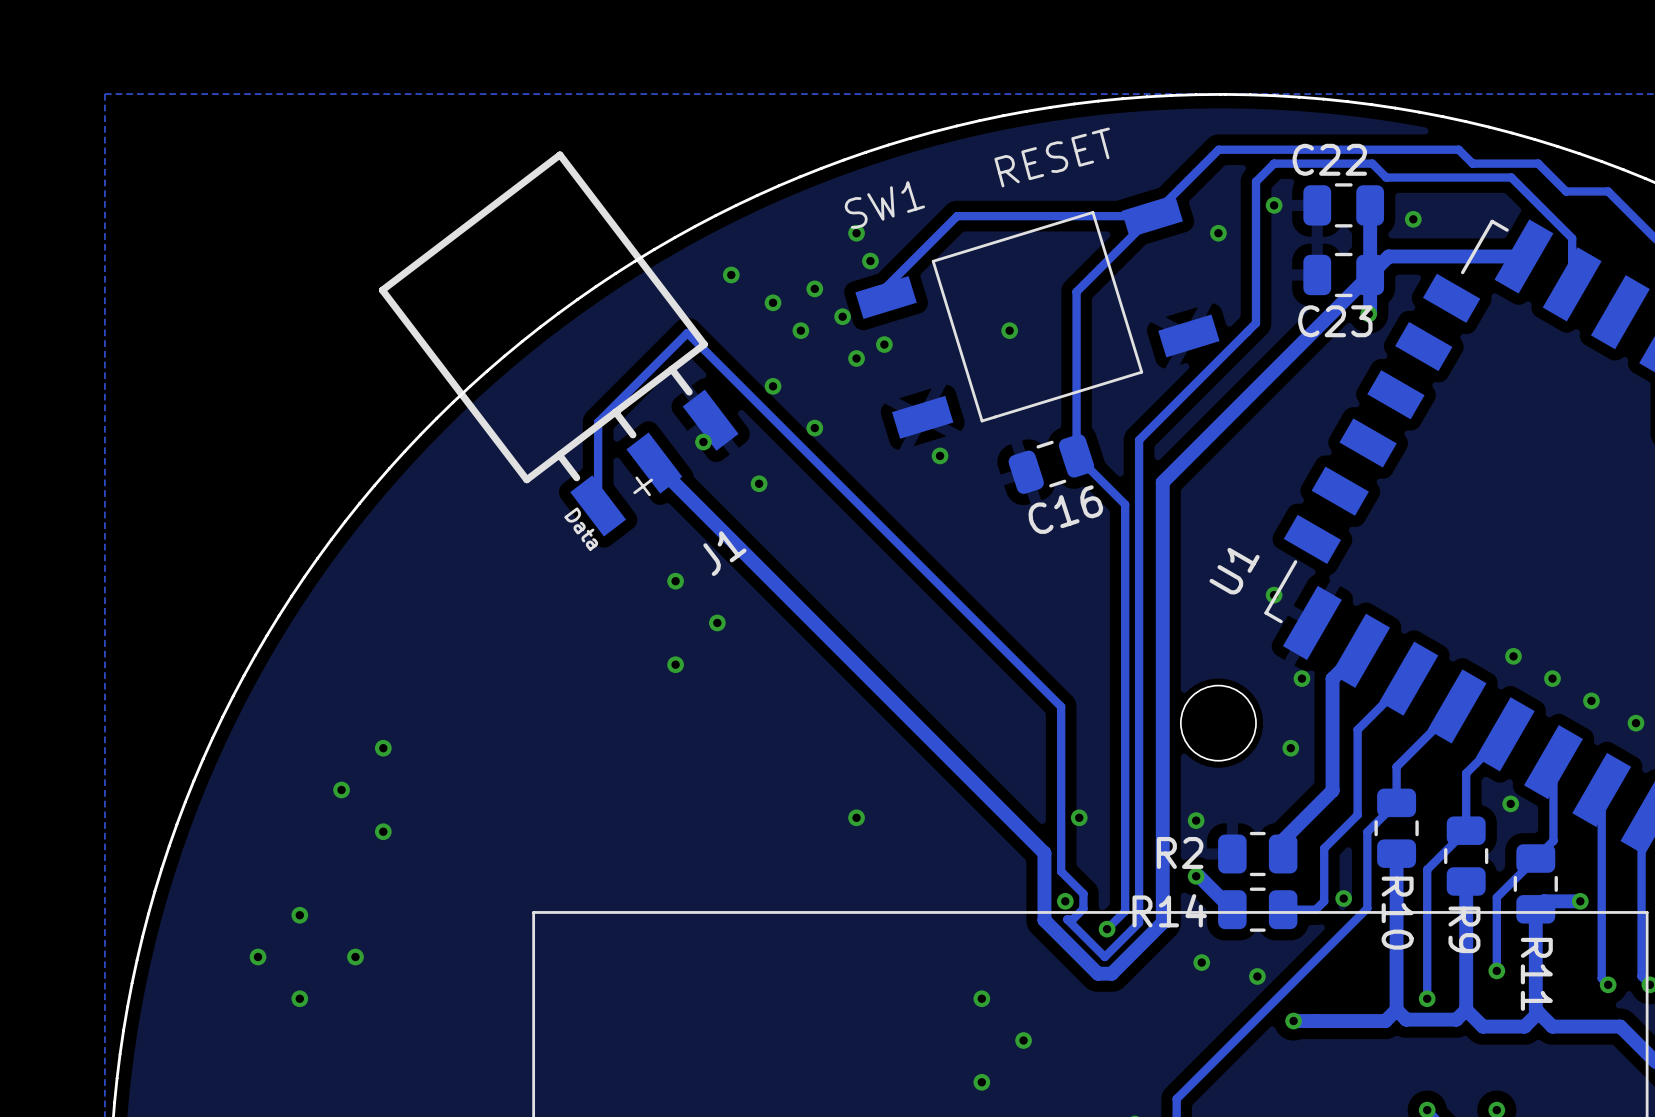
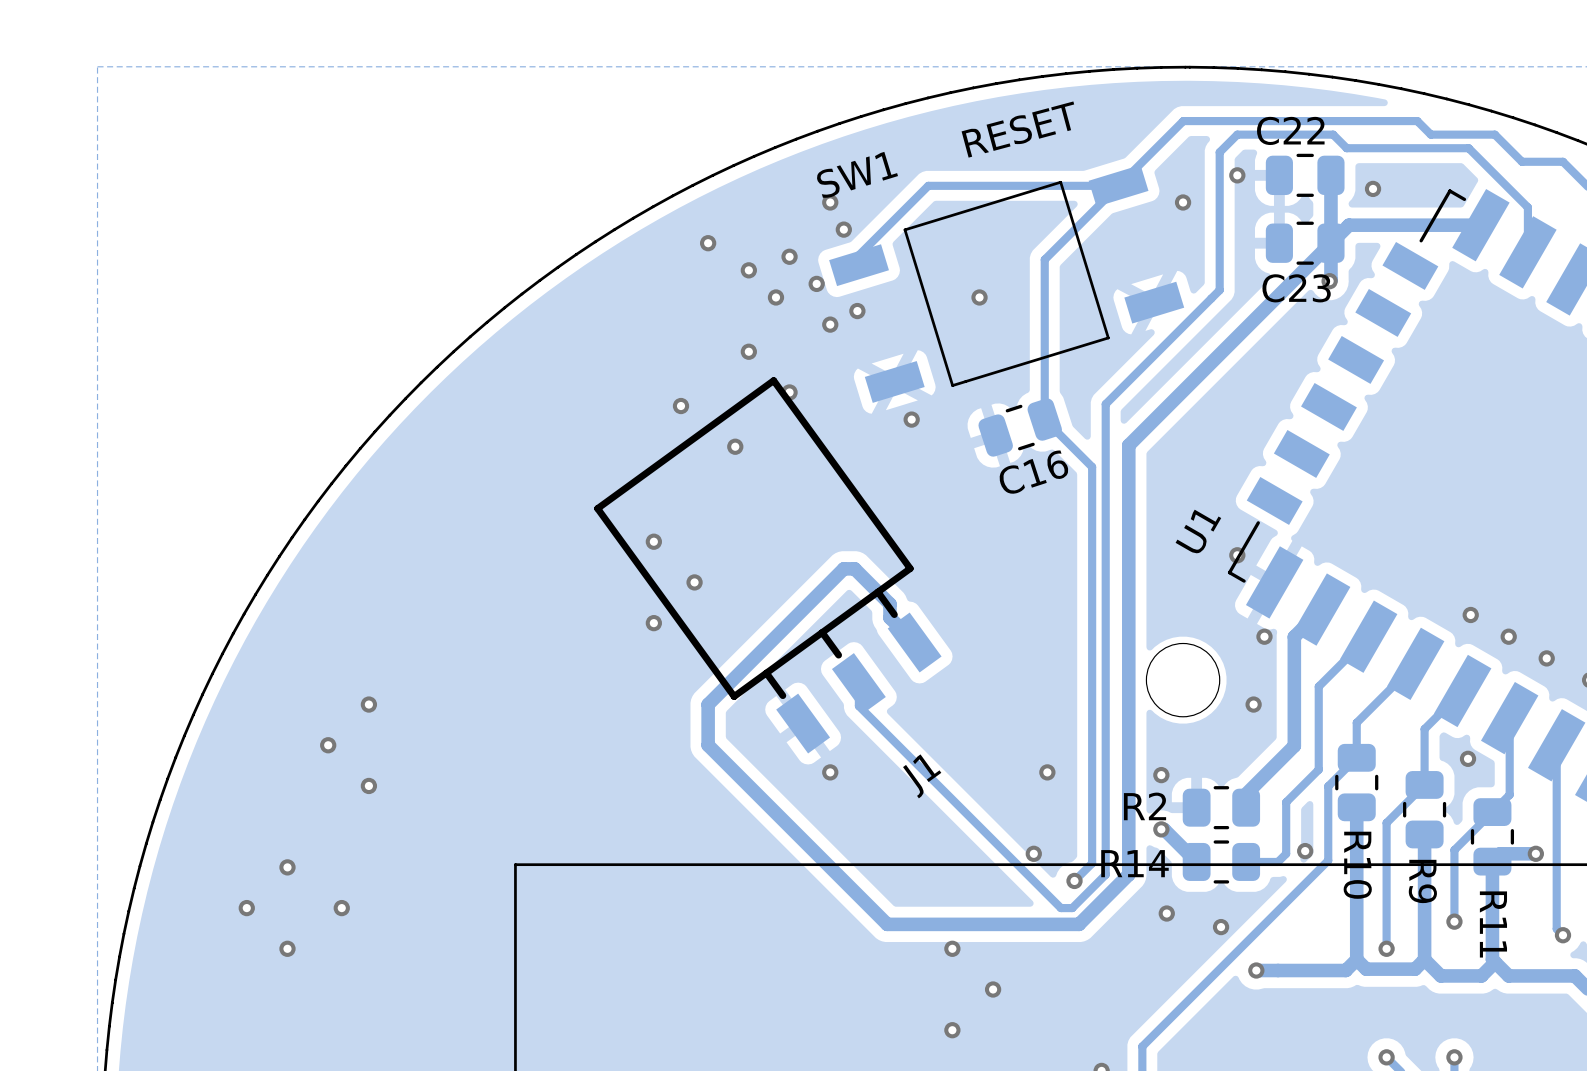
J1 rotation: 0° (558, 343) -> 1.3° clockwise (767, 565)
J1 position: (558, 343) -> (767, 565)
track: (654, 463) (1044, 853) (1044, 920) (1097, 973) -> (914, 642) (889, 617) (889, 604) (854, 568) (843, 568) (708, 704) (708, 745) (887, 924) (1065, 924)
text: + (643, 486) -> none
track: (598, 505) (598, 422) (687, 333) (1061, 706) (1061, 871) (1083, 893) (1083, 908) (1072, 919) (1067, 919) (1104, 957) -> (858, 683) (858, 706) (1060, 908) (1072, 908)
text: Data (581, 529) -> none

